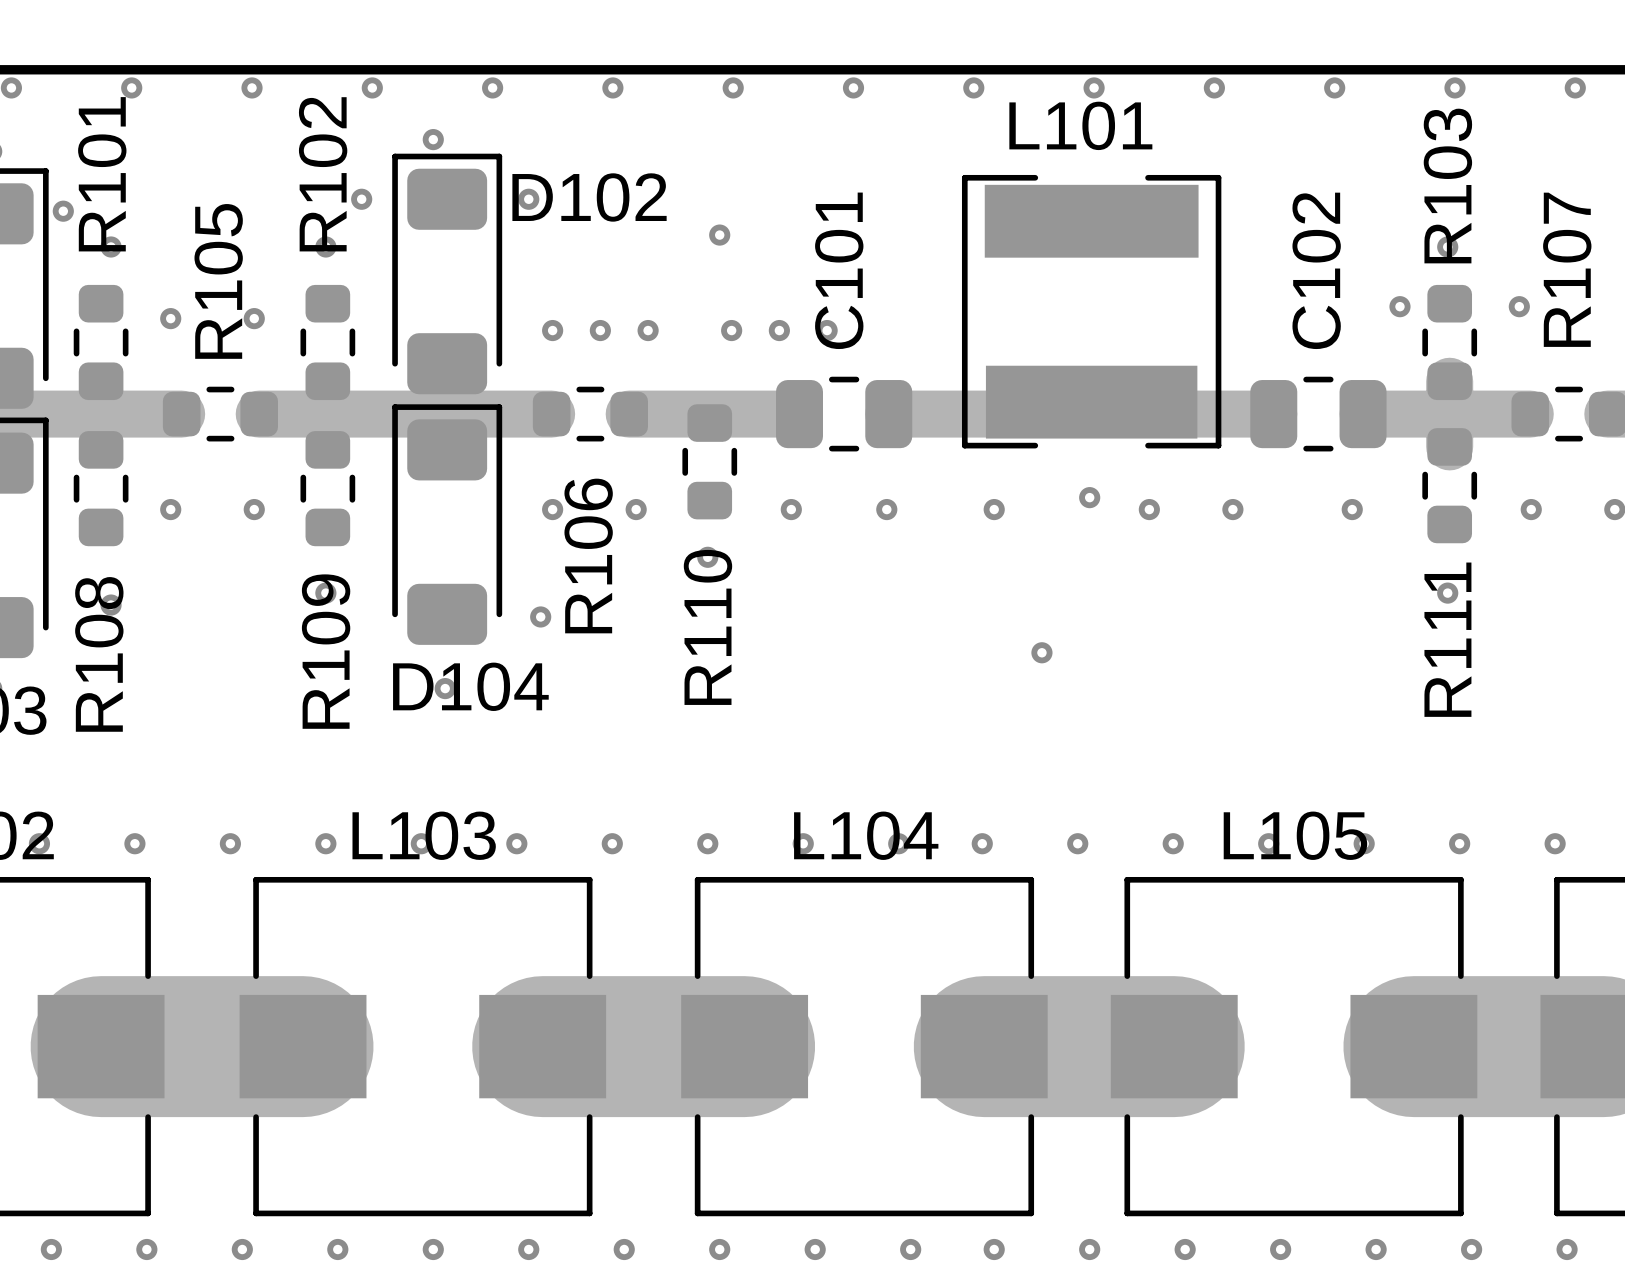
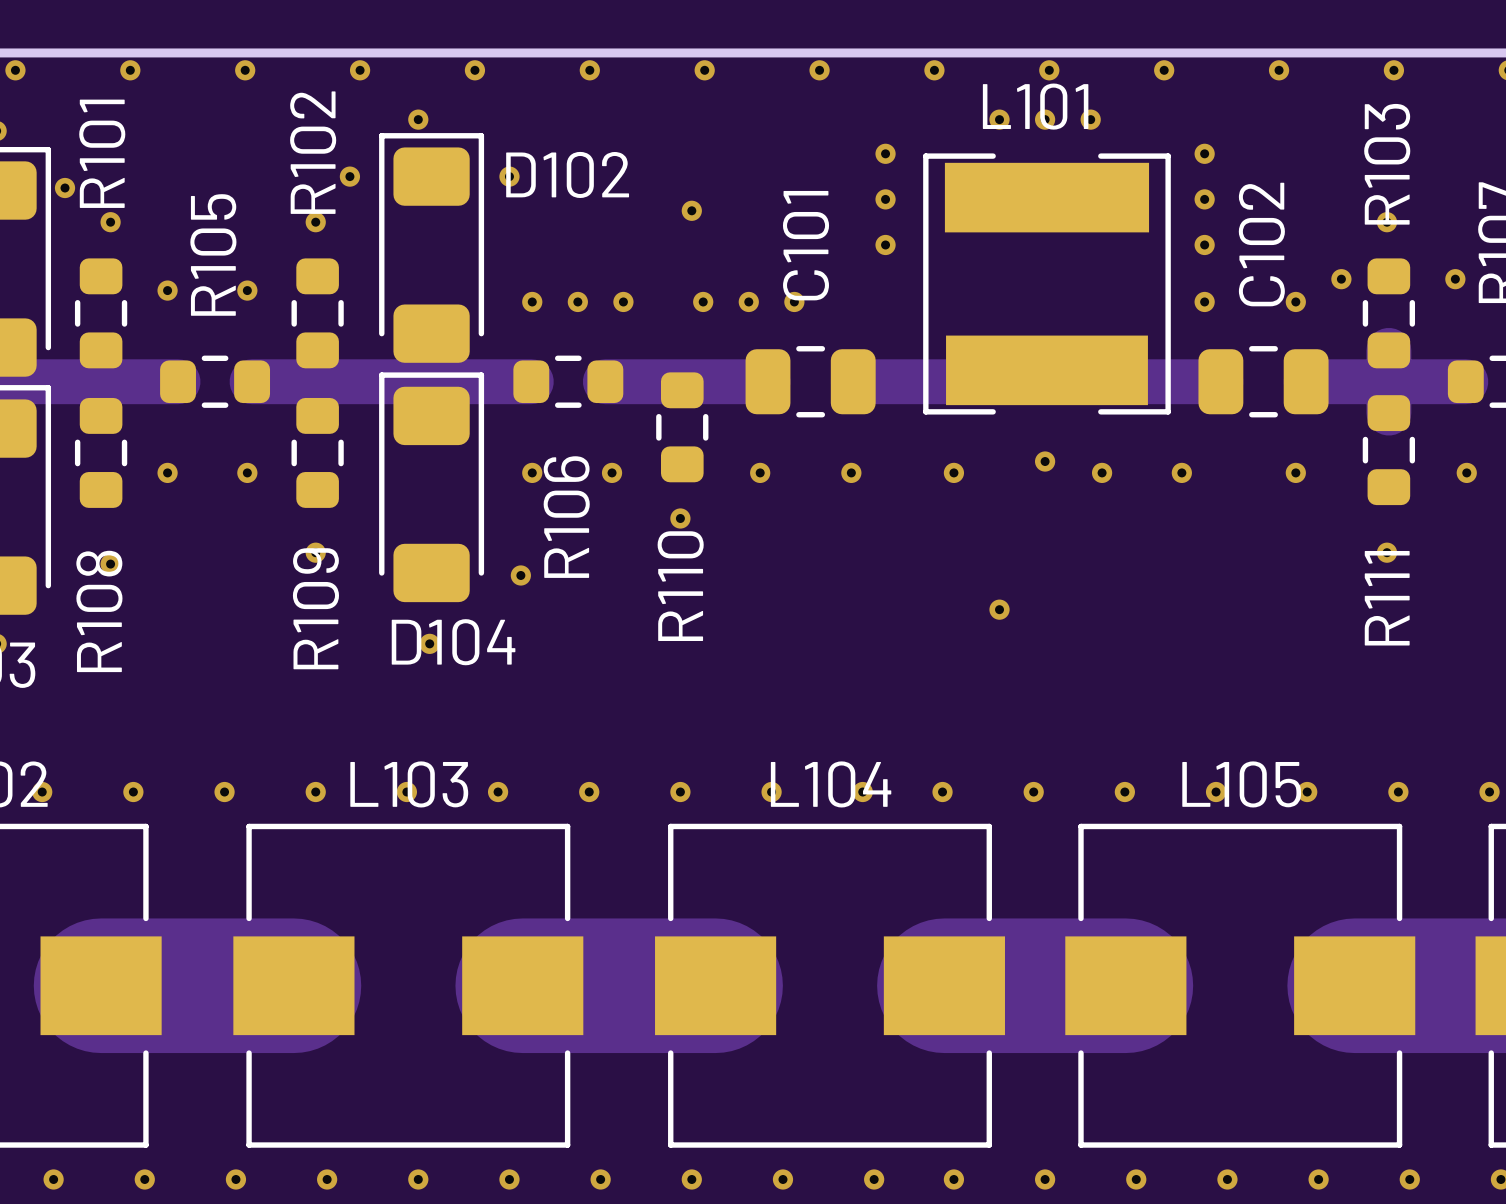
via: none -> (999, 119)
via: none -> (1045, 119)
via: none -> (1090, 119)
via: none -> (885, 153)
via: none -> (1204, 153)
via: none -> (885, 199)
via: none -> (1204, 199)
via: none -> (885, 244)
via: none -> (1204, 244)
via: none -> (1204, 301)
via: none -> (1295, 301)

